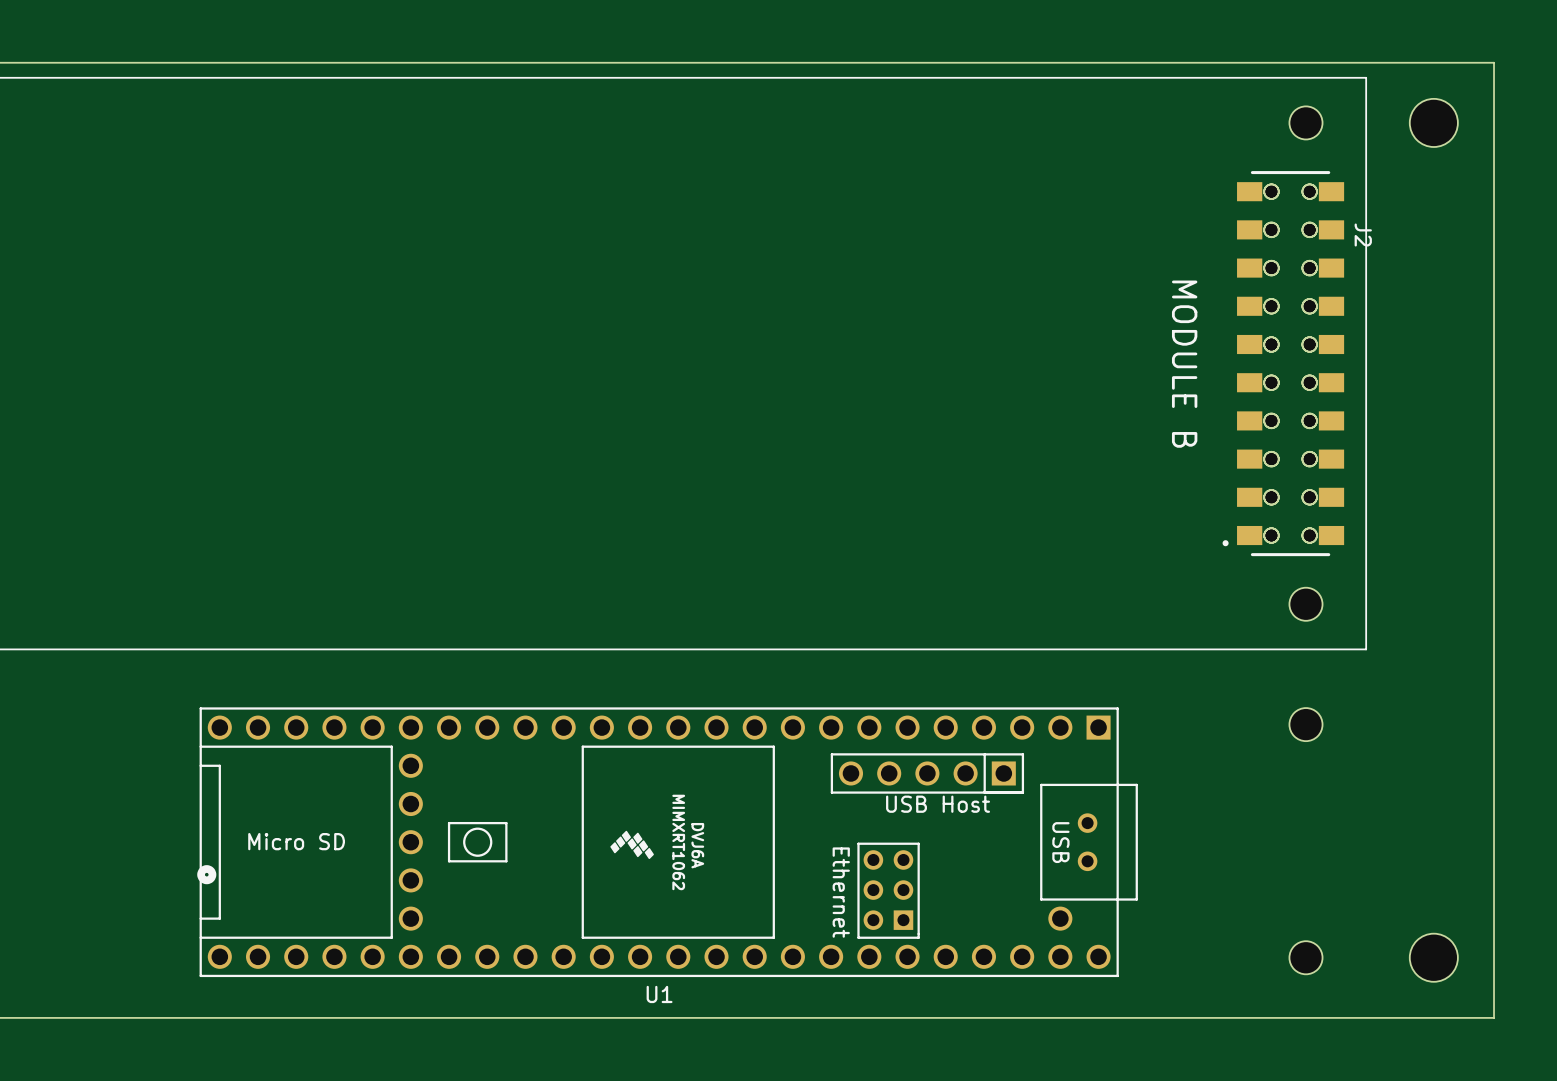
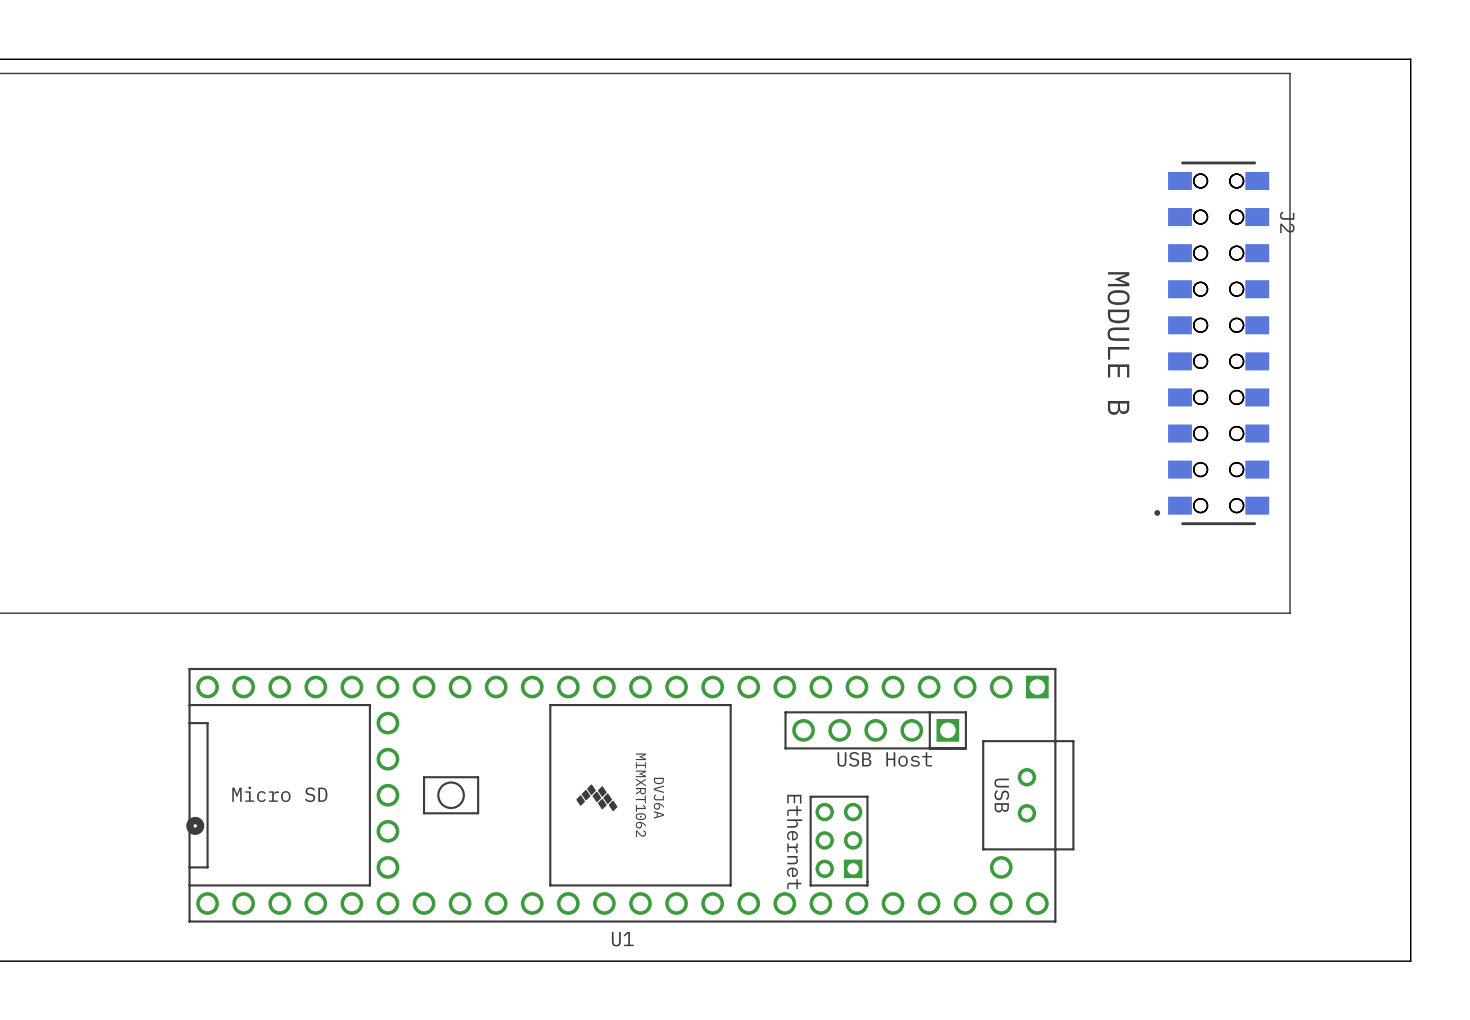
part: (1305, 122) -> none
part: (1433, 122) -> none
part: (1305, 604) -> none
part: (1305, 724) -> none
part: (1305, 957) -> none
part: (1433, 957) -> none

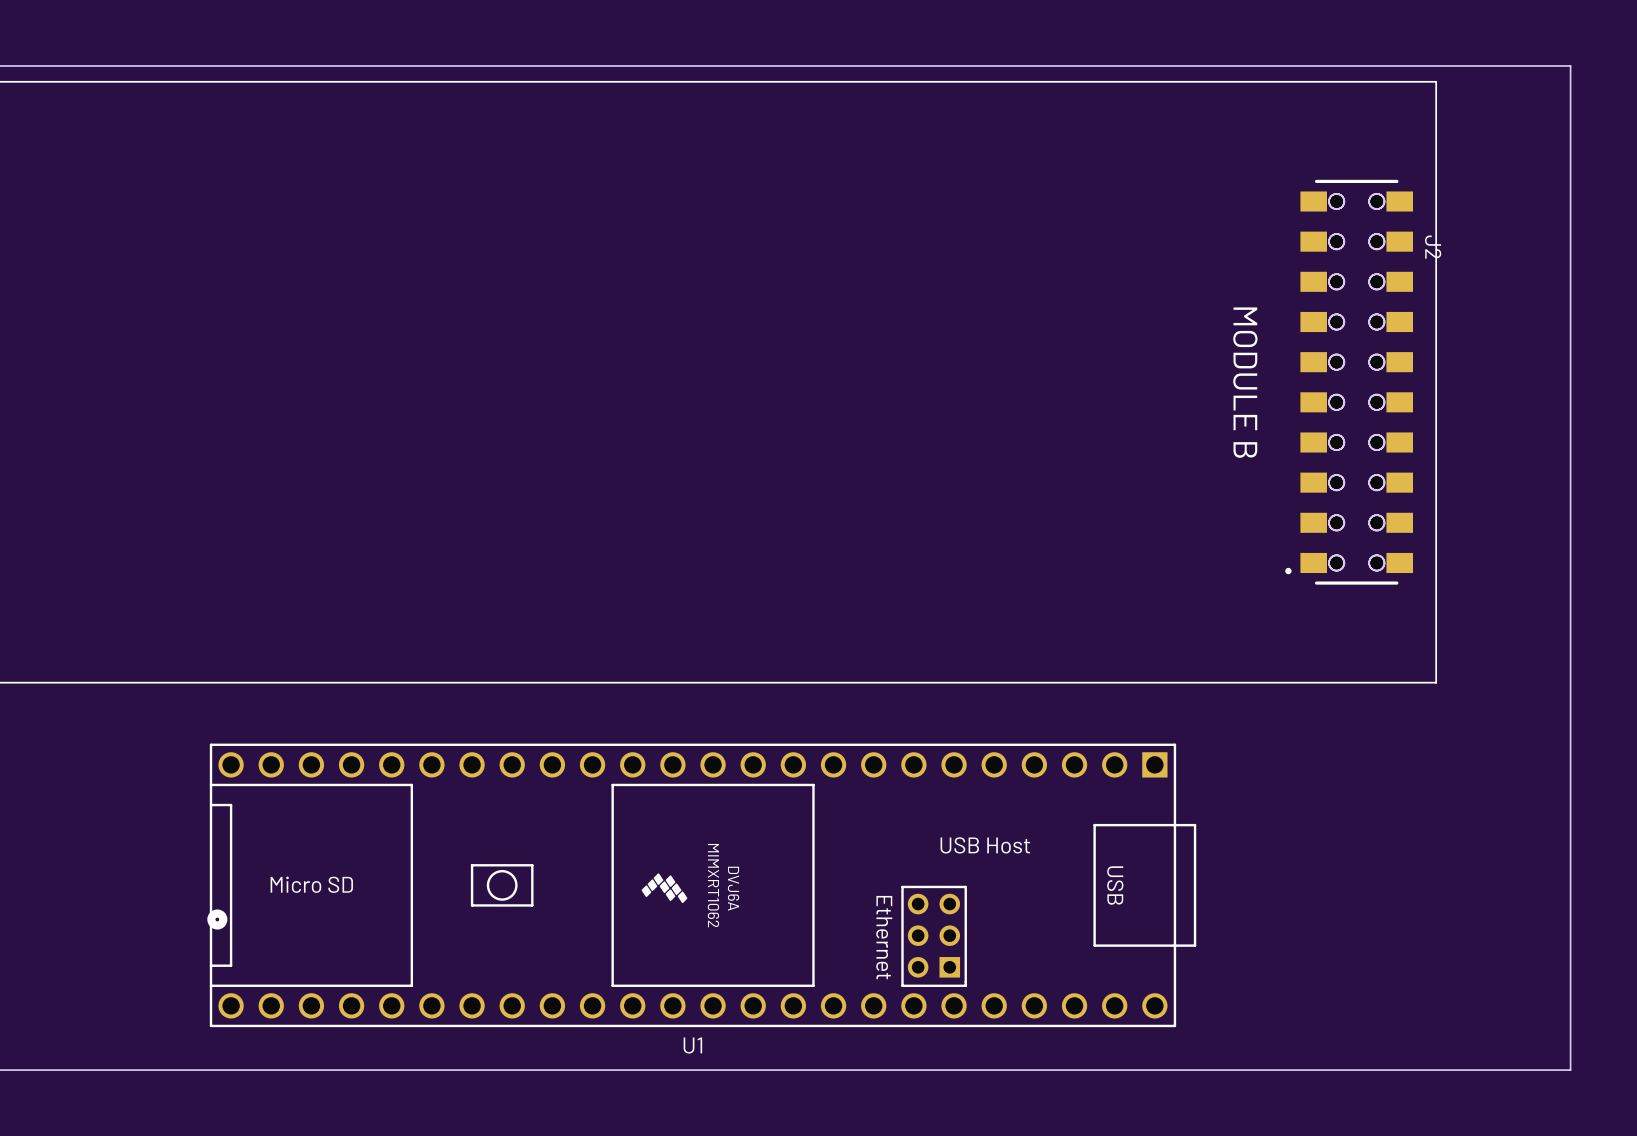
U1 footprint: [188, 667, 1075, 923] -> [209, 743, 1197, 1028]

